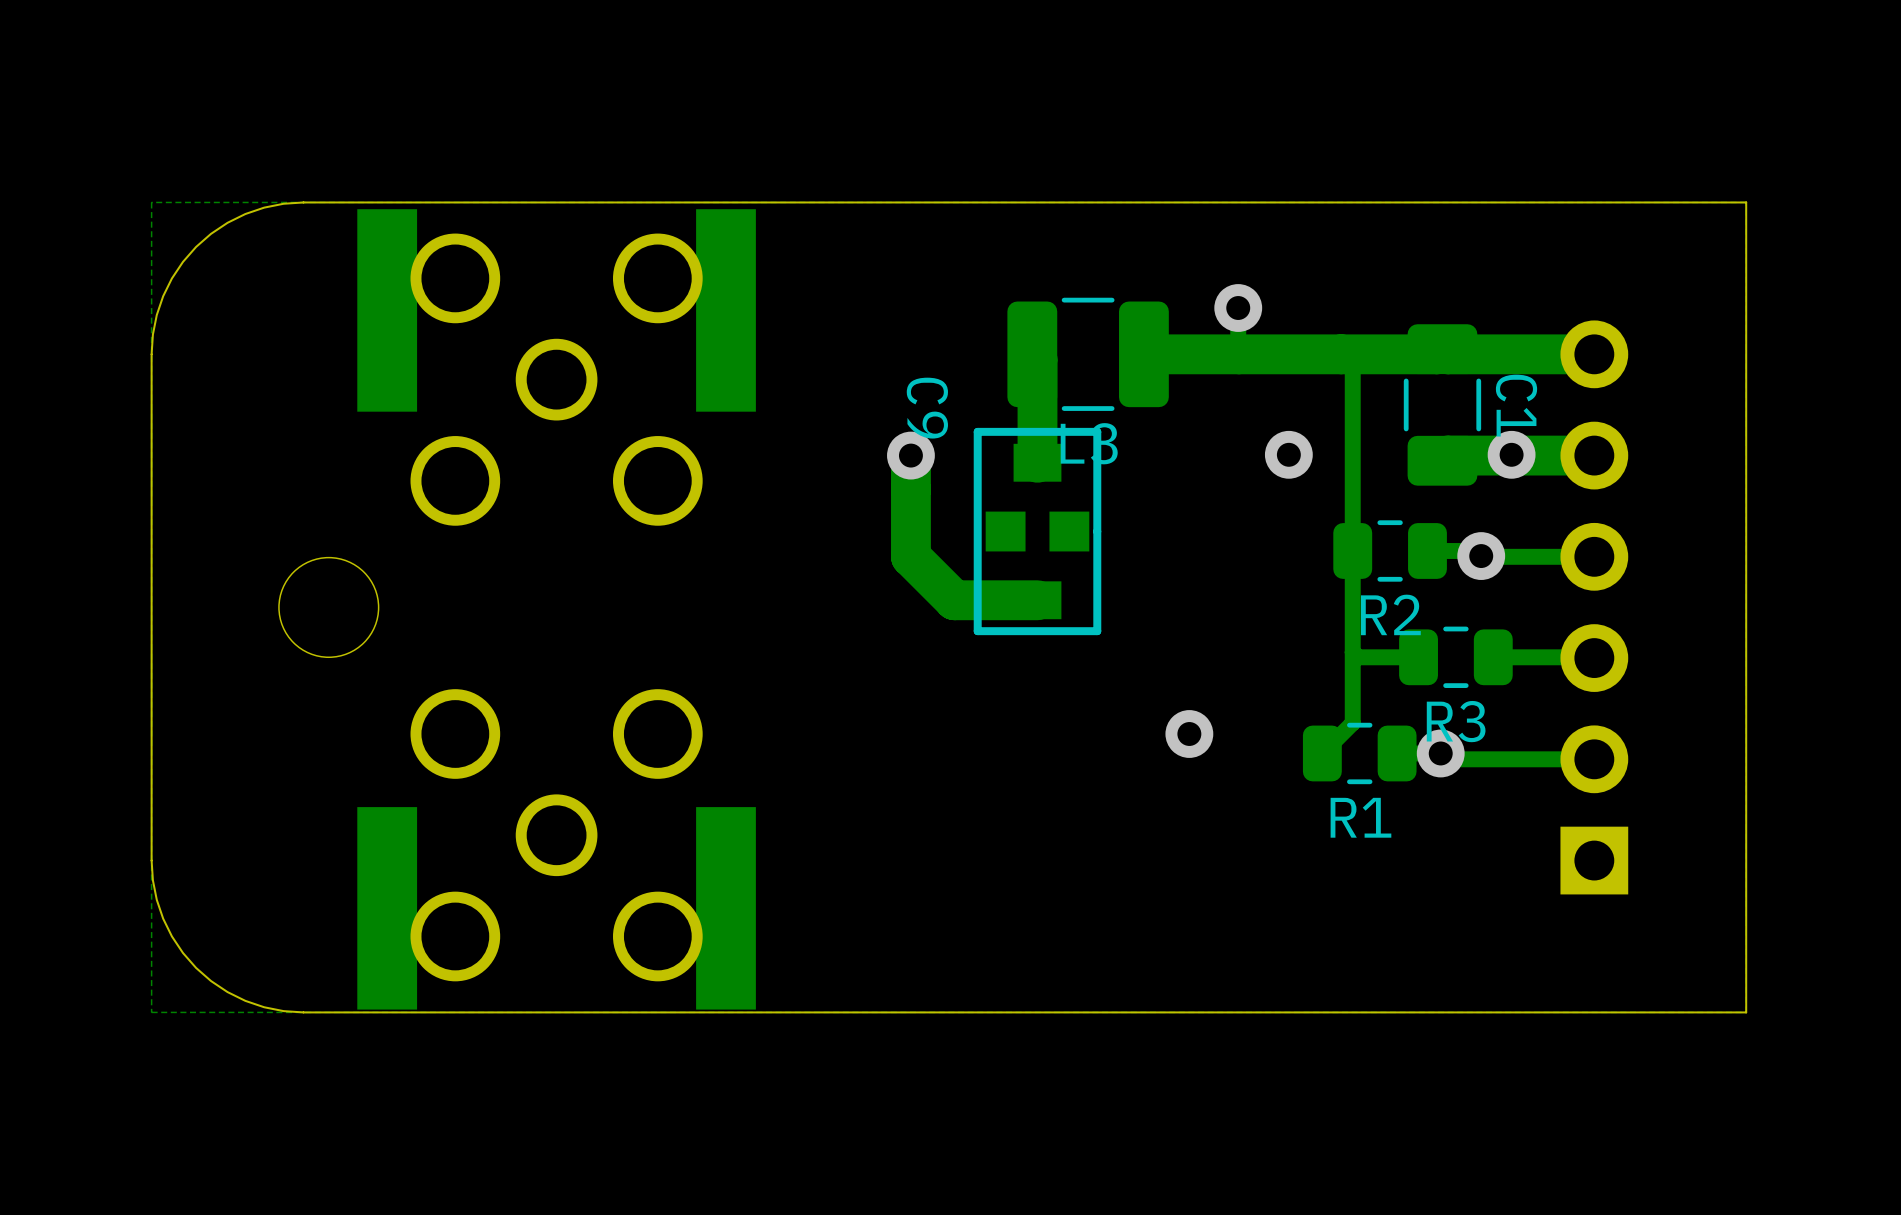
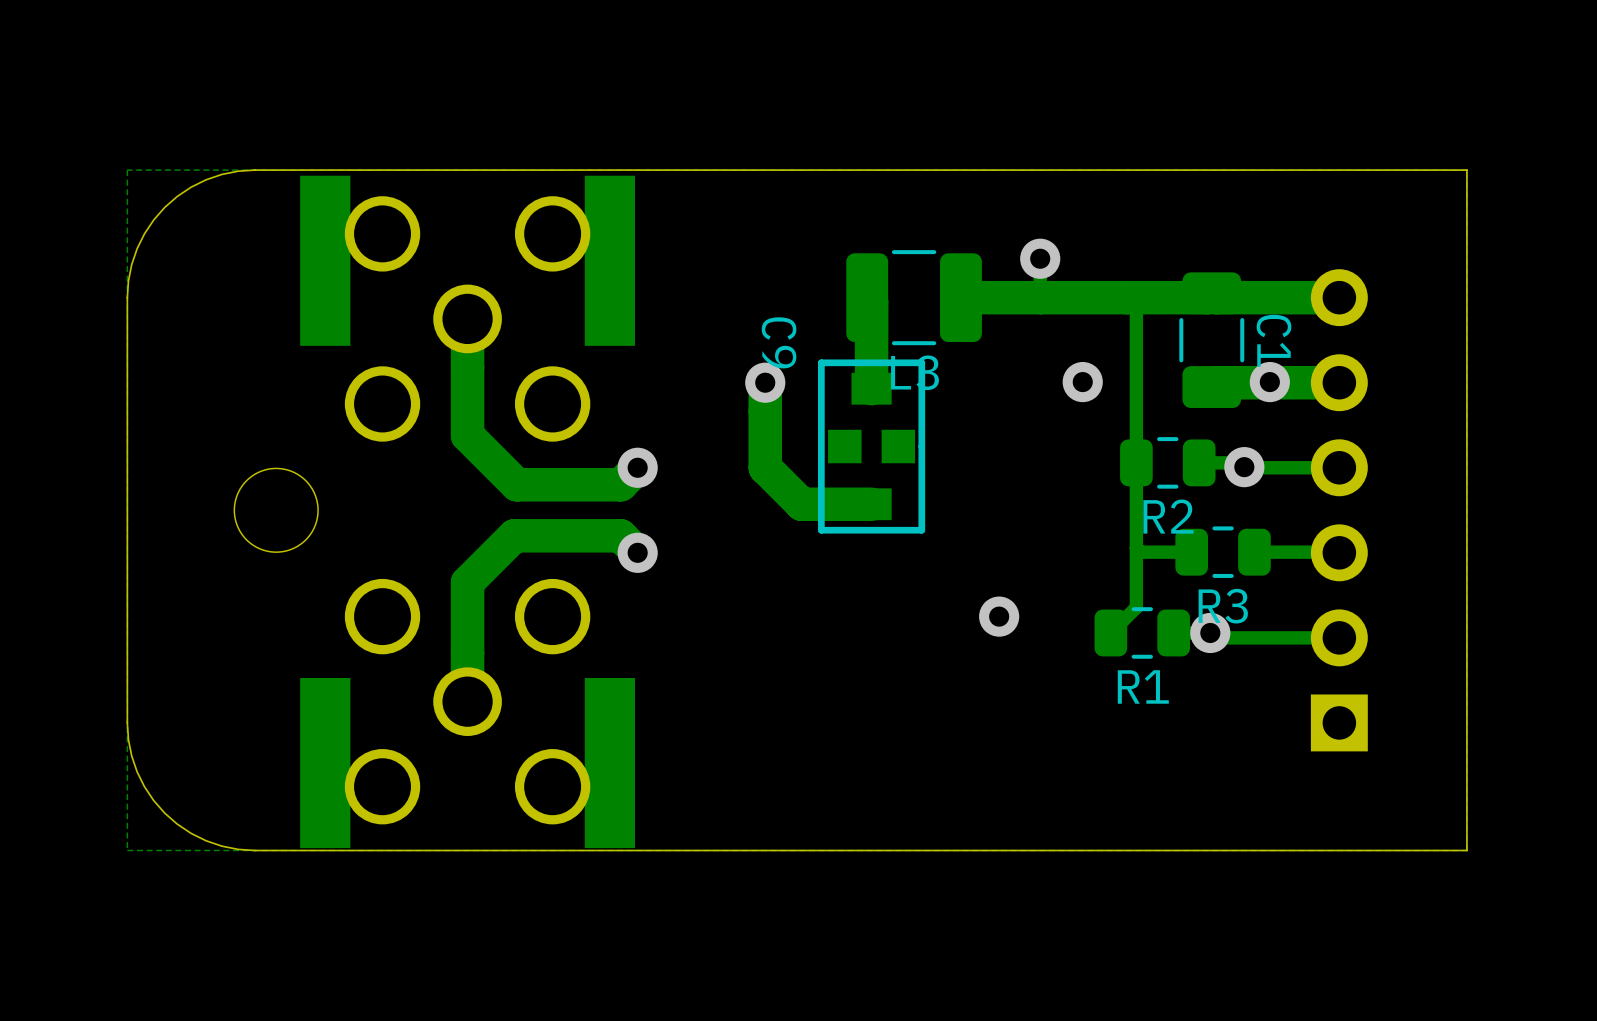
track: none -> (467, 318) (467, 435) (516, 484) (620, 484) (637, 467)
via: none -> (637, 467)
track: none -> (637, 552) (620, 535) (514, 535) (467, 582) (467, 701)
via: none -> (637, 552)

